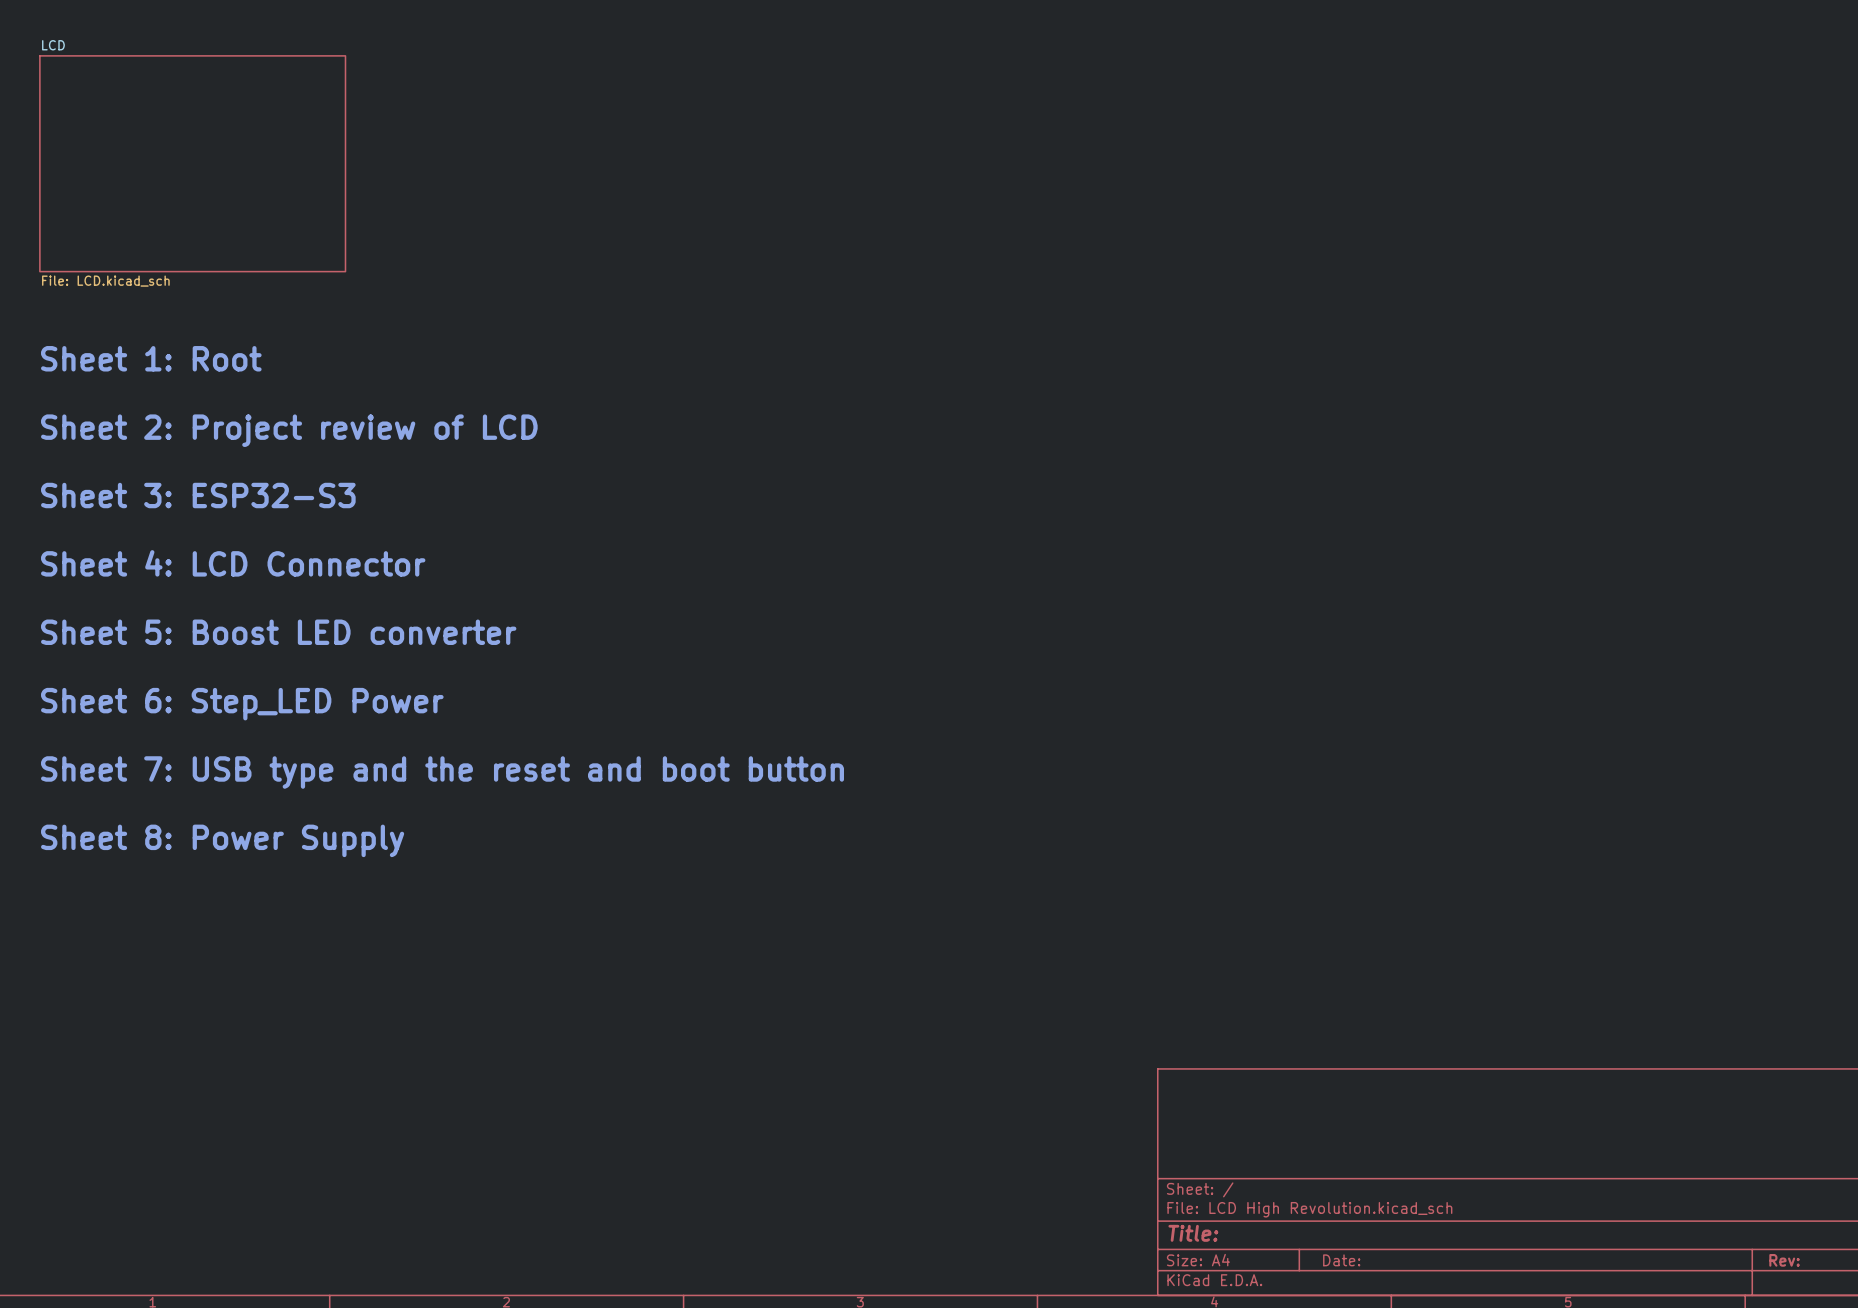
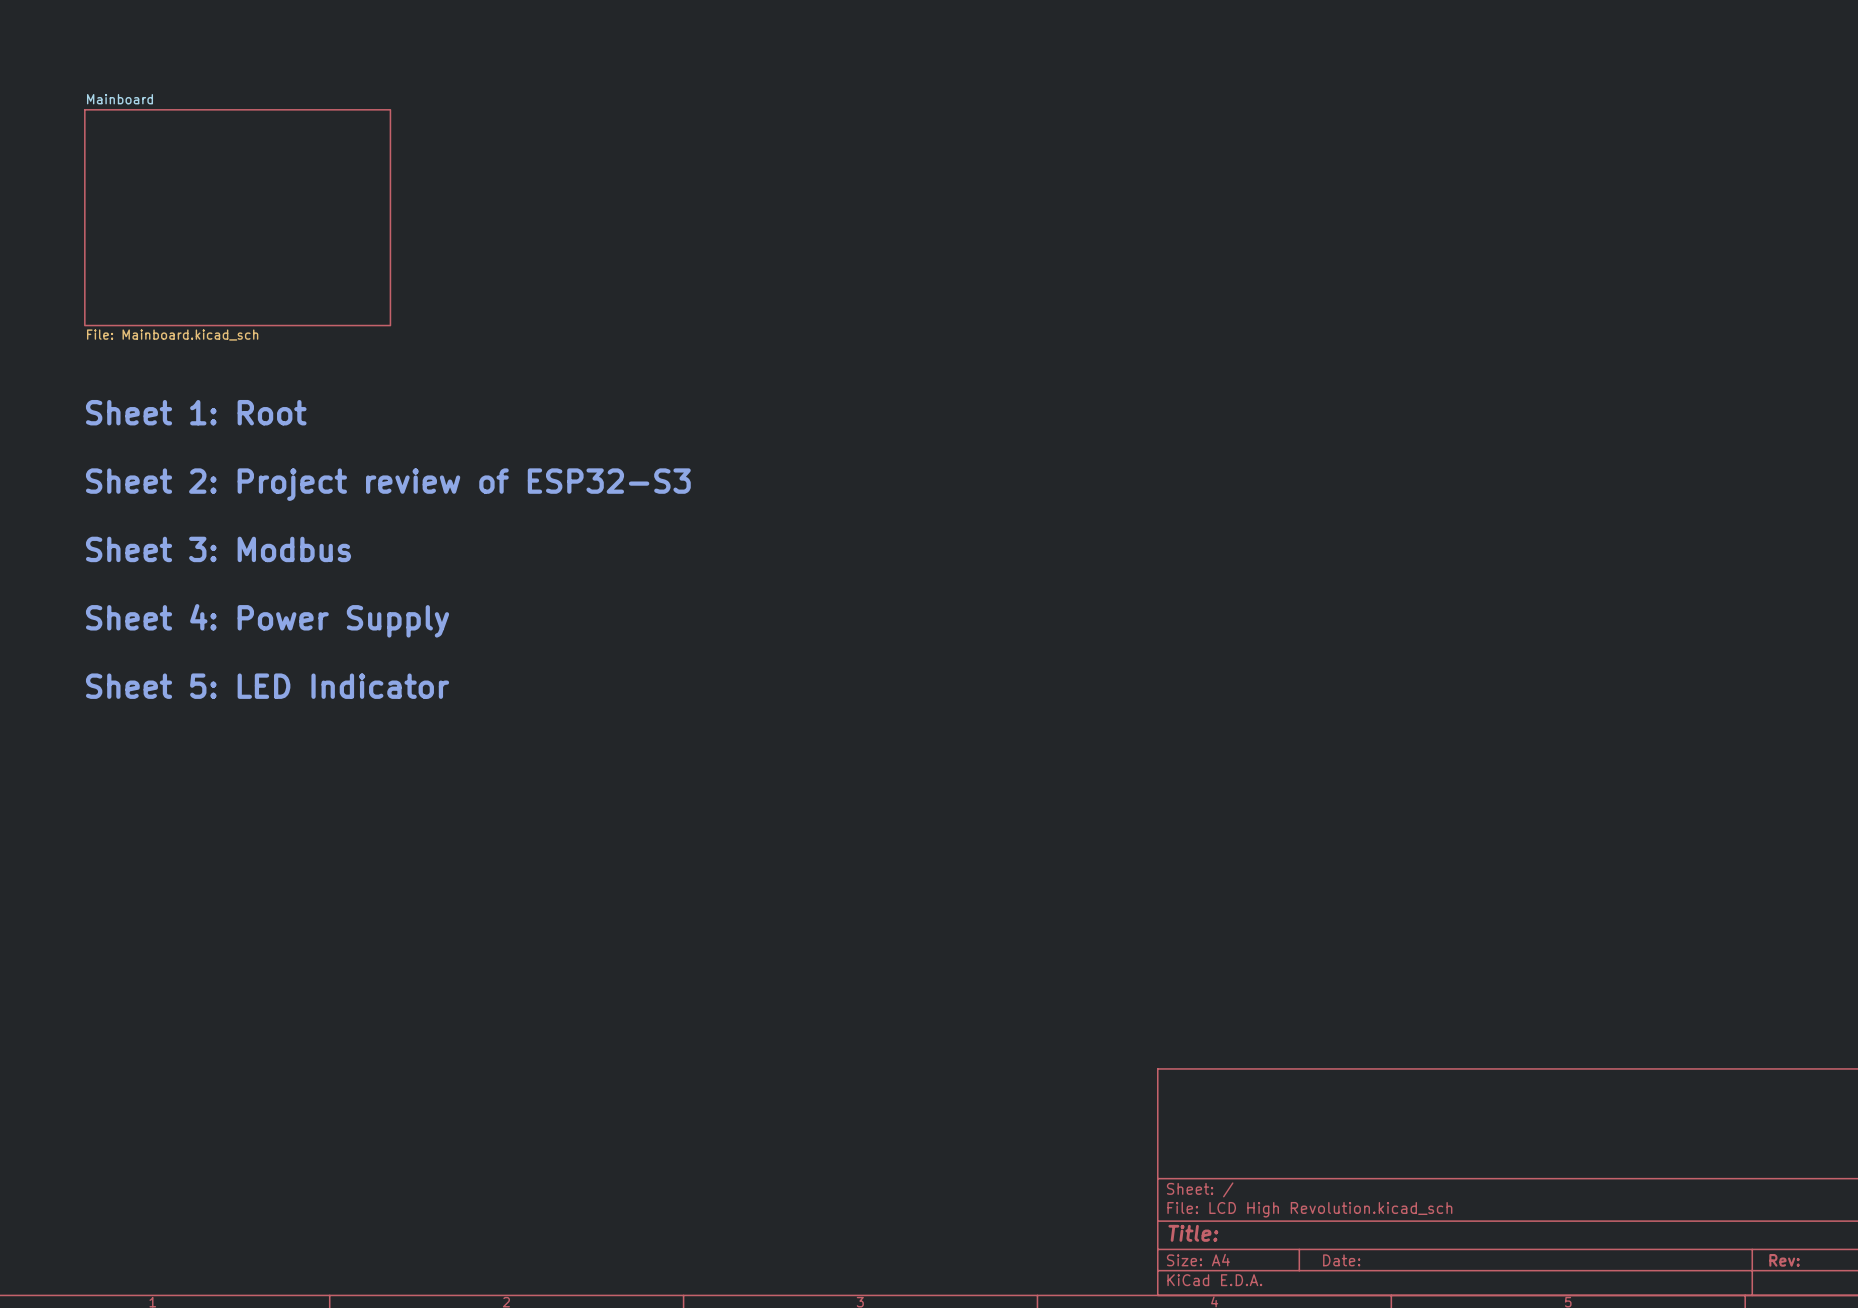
sheet LCD: File: LCD.kicad_sch (192, 163) -> none
sheet Mainboard: none -> File: Mainboard.kicad_sch (237, 217)
text position: Sheet 1: Root (151, 358) -> Sheet 1: Root (196, 412)
text: Sheet 2: Project review of LCD (289, 430) -> none
text: Sheet 3: ESP32-S3 (198, 495) -> Sheet 2: Project review of ESP32-S3 (388, 484)
text: none -> Sheet 3: Modbus (218, 549)
text: Sheet 4: LCD Connector (233, 563) -> none
text: none -> Sheet 4: Power Supply (267, 620)
text: Sheet 5: Boost LED converter (278, 632) -> none
text: Sheet 6: Step_LED Power (242, 704) -> Sheet 5: LED Indicator (267, 686)
text: Sheet 7: USB type and the reset and boot button (442, 772) -> none
text: Sheet 8: Power Supply (222, 840) -> none

